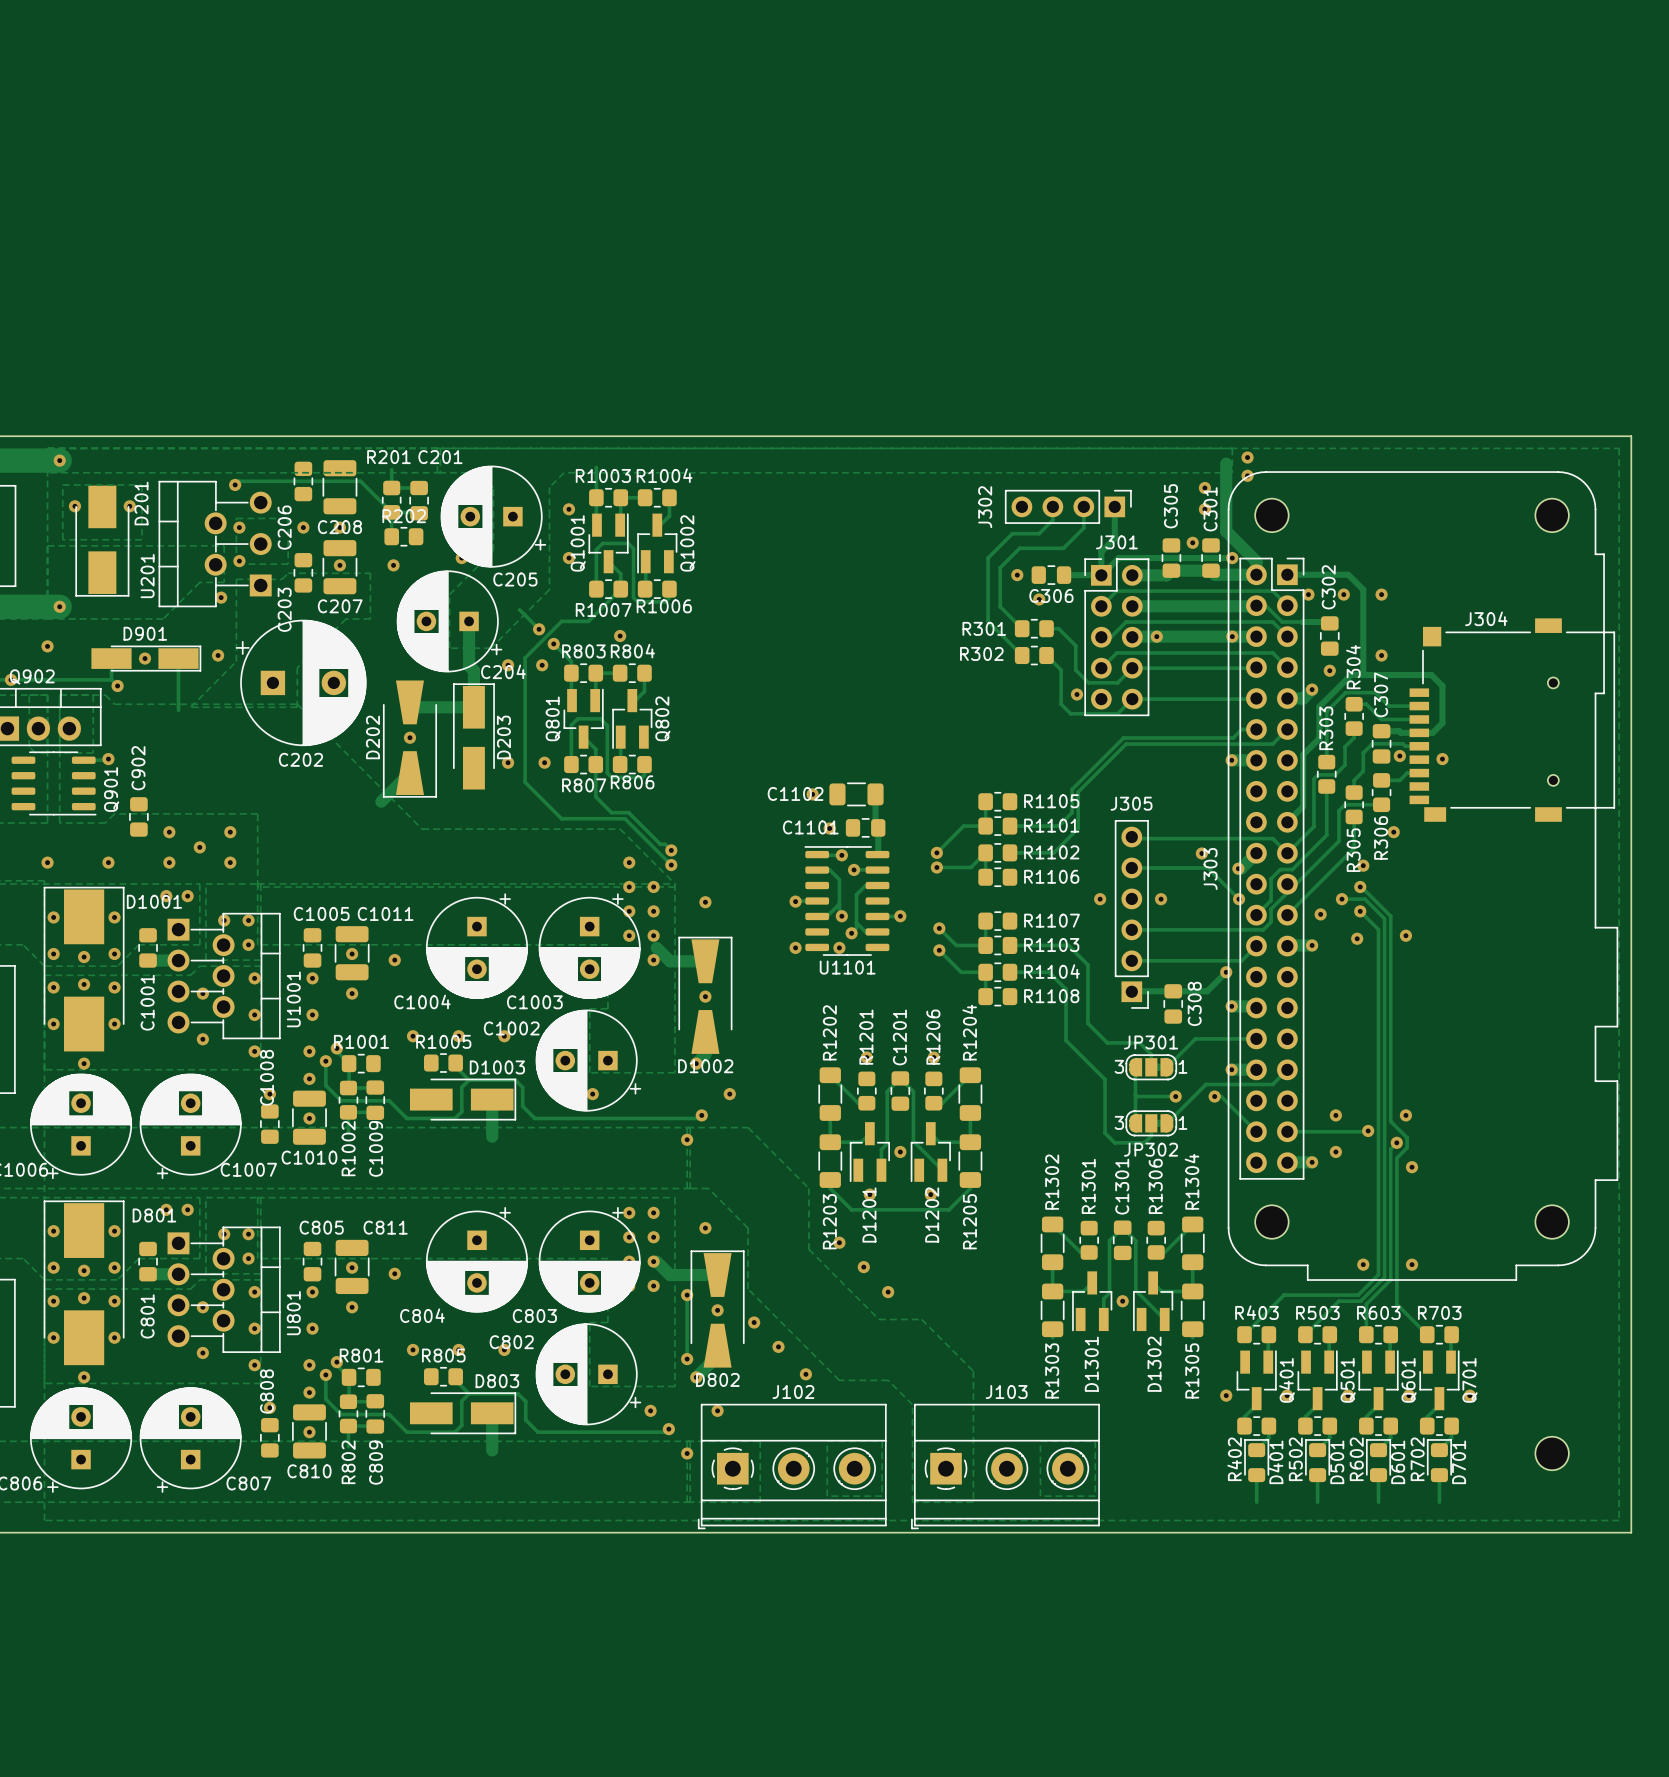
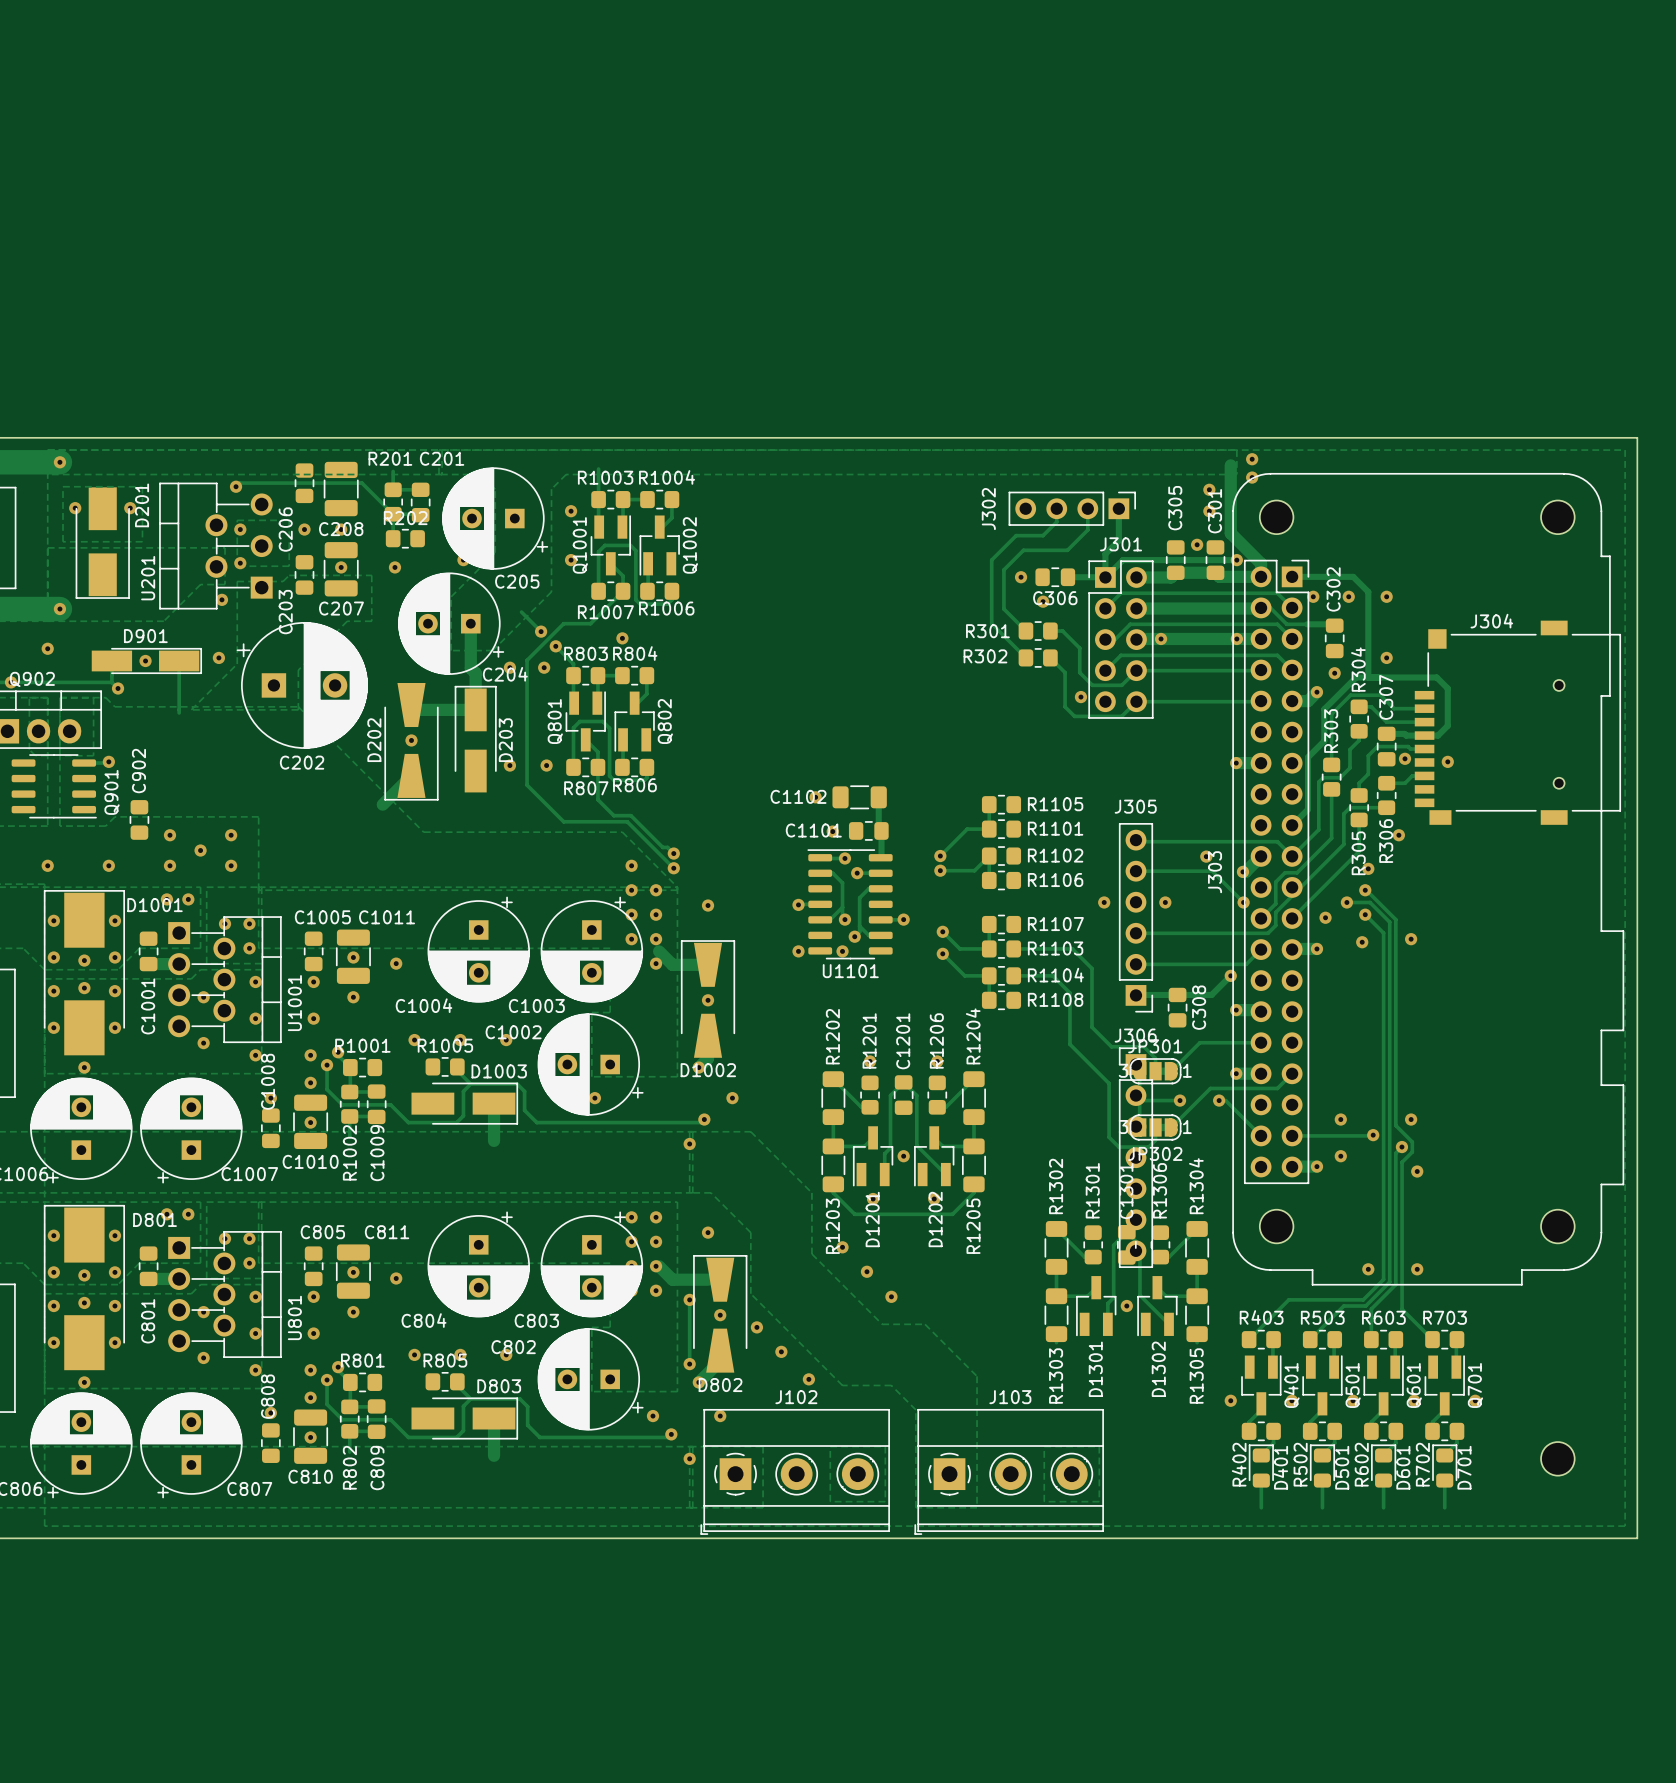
track: (1256, 729) (1241, 729) (1233, 737) (1123, 737) (1072, 789) (1072, 812) (1058, 826) (1009, 826) -> none
track: (1287, 729) (1272, 744) (1126, 744) (1078, 791) (1078, 828) (1053, 852) (1009, 852) -> none
J306: none -> (1135, 1157)

